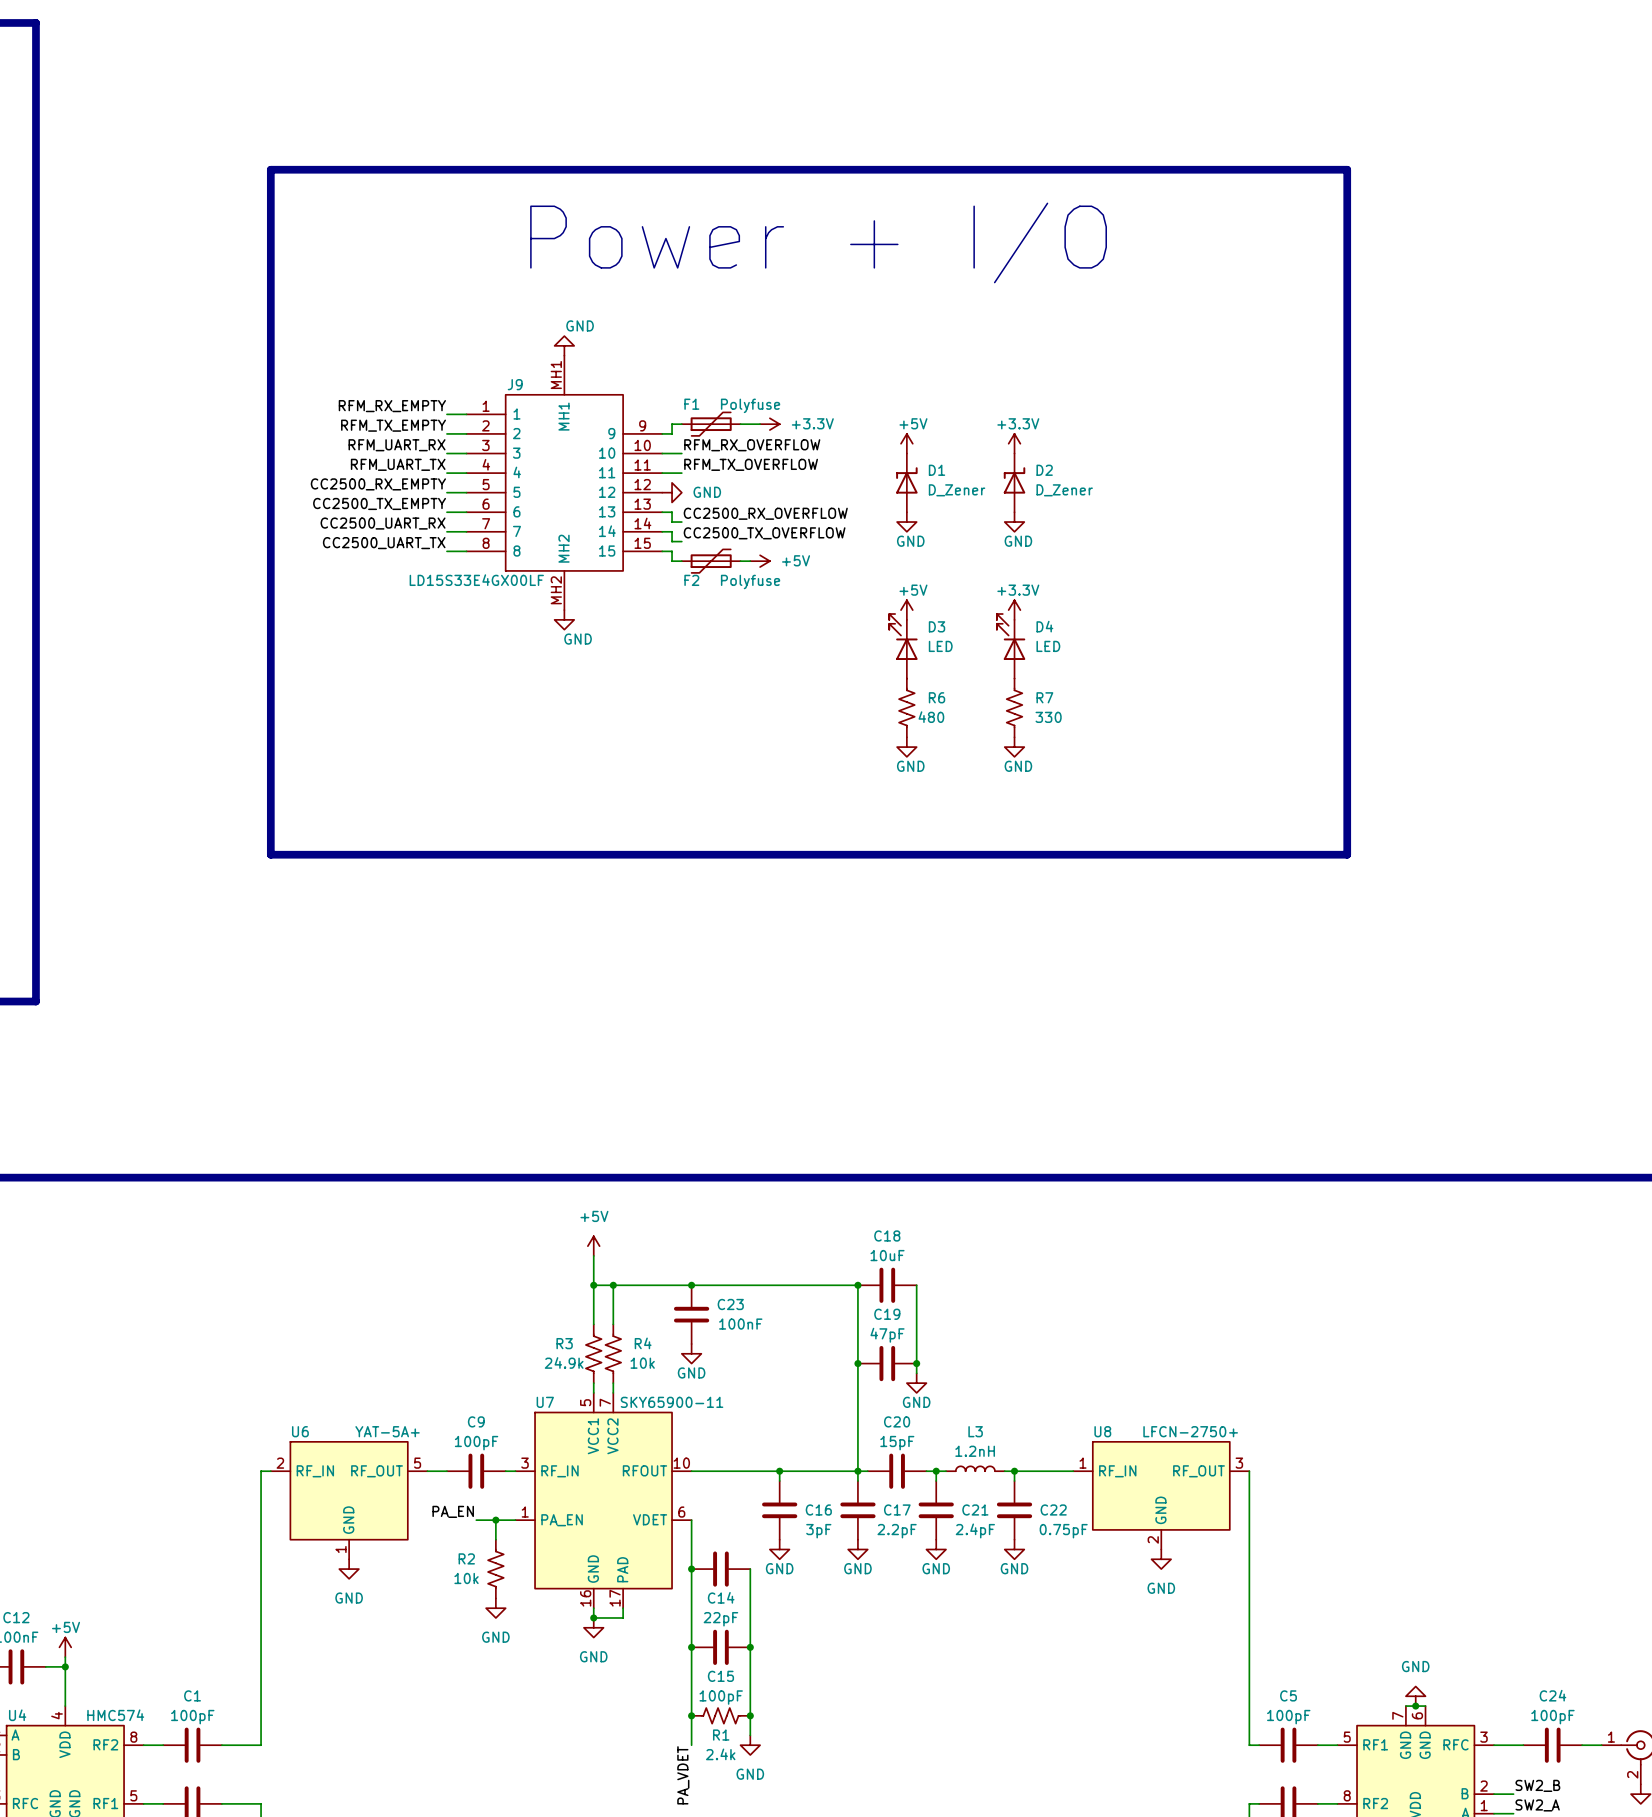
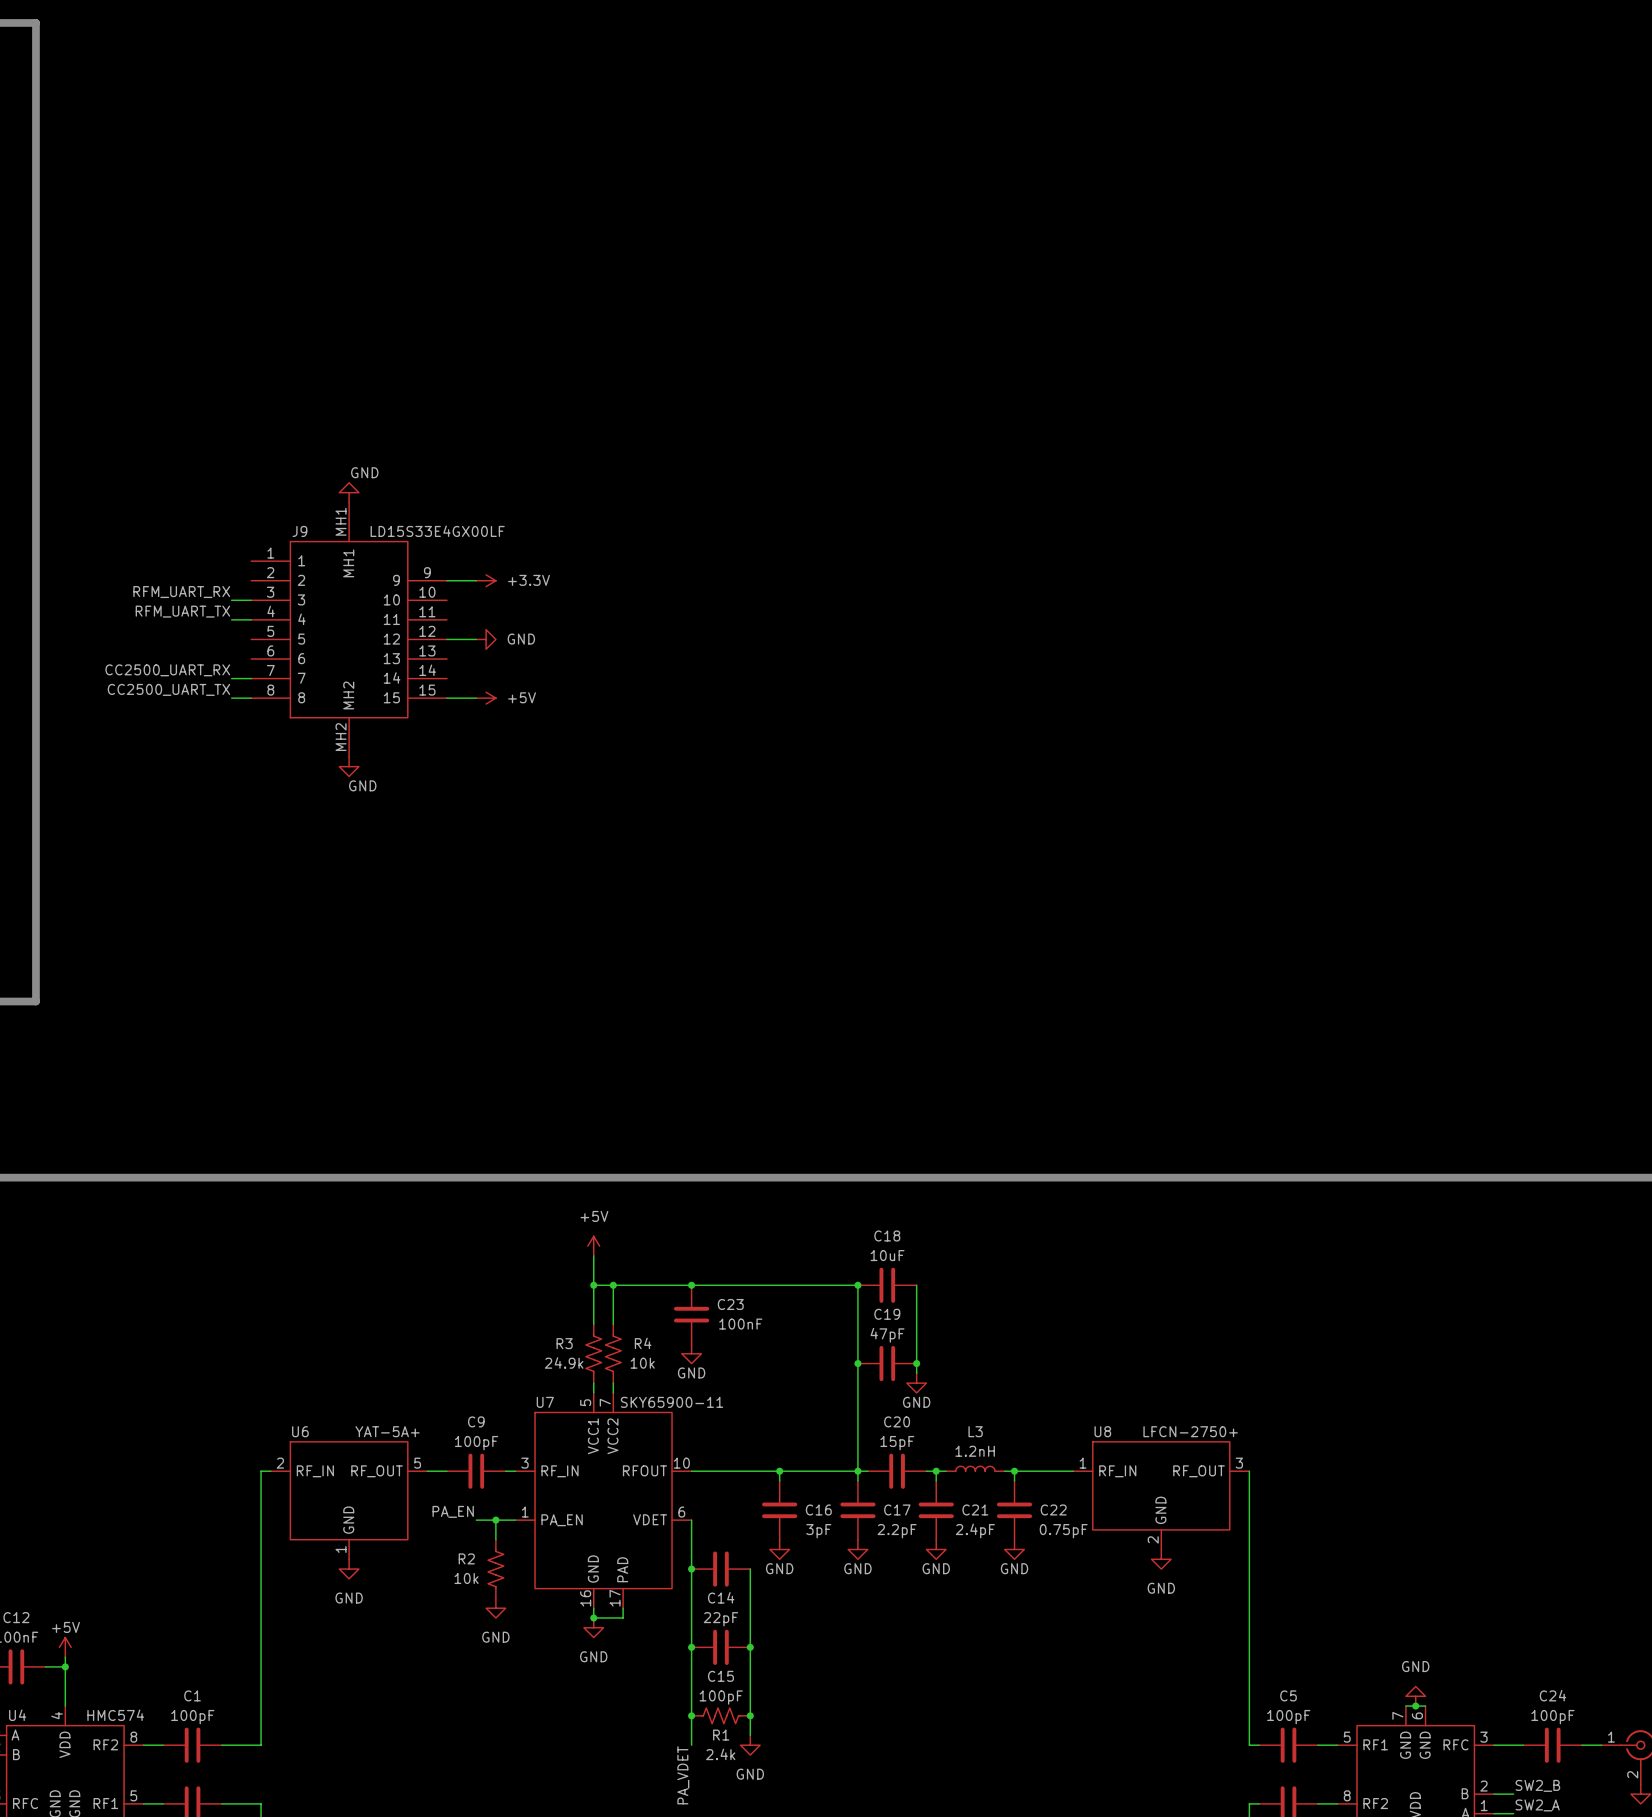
line: (270, 169) (270, 854) (1347, 854) (1347, 169) (270, 169) -> none
text: Power + I/O (818, 242) -> none
power symbol: GND (564, 345) -> none
label: RFM_RX_EMPTY (392, 406) -> none
wire: (446, 414) (466, 414) -> none
wire: (681, 424) (672, 424) (672, 433) (662, 433) -> none
F1: Polyfuse (711, 424) -> none
wire: (740, 424) (760, 424) -> none
power symbol: +3.3V (769, 424) -> none
label: RFM_TX_EMPTY (393, 425) -> none
wire: (446, 433) (466, 433) -> none
power symbol: +5V (906, 443) -> none
power symbol: +3.3V (1014, 443) -> none
label: RFM_UART_RX (397, 445) -> none
label: RFM_RX_OVERFLOW (752, 445) -> none
wire: (446, 453) (466, 453) -> none
wire: (662, 453) (681, 453) -> none
label: RFM_UART_TX (398, 464) -> none
label: RFM_TX_OVERFLOW (751, 464) -> none
wire: (446, 473) (466, 473) -> none
wire: (662, 473) (681, 473) -> none
J9 position: (564, 482) -> (349, 629)
D1: D_Zener (906, 482) -> none
D2: D_Zener (1014, 482) -> none
label: CC2500_RX_EMPTY (378, 484) -> none
power symbol: none -> GND (349, 492)
wire: (446, 492) (466, 492) -> none
power symbol: GND (672, 492) -> none
label: CC2500_TX_EMPTY (379, 503) -> none
wire: (446, 512) (466, 512) -> none
wire: (662, 512) (672, 512) (672, 522) (681, 522) -> none
label: CC2500_RX_OVERFLOW (765, 513) -> none
power symbol: GND (906, 522) -> none
power symbol: GND (1014, 522) -> none
label: CC2500_UART_RX (383, 523) -> none
wire: (446, 531) (466, 531) -> none
wire: (662, 531) (672, 531) (672, 541) (681, 541) -> none
label: CC2500_TX_OVERFLOW (764, 533) -> none
label: CC2500_UART_TX (384, 543) -> none
wire: (446, 551) (466, 551) -> none
wire: (662, 551) (672, 551) (672, 561) (681, 561) -> none
F2: Polyfuse (711, 561) -> none
wire: (740, 561) (750, 561) -> none
power symbol: +5V (760, 561) -> none
wire: none -> (446, 580) (476, 580)
J9 value position: LD15S33E4GX00LF (476, 580) -> LD15S33E4GX00LF (437, 531)
power symbol: none -> +3.3V (486, 580)
label: none -> RFM_UART_RX (181, 592)
wire: none -> (231, 600) (251, 600)
power symbol: +5V (906, 610) -> none
power symbol: +3.3V (1014, 610) -> none
label: none -> RFM_UART_TX (182, 611)
wire: none -> (231, 619) (251, 619)
power symbol rotation: 0° (564, 619) -> 90° counterclockwise (486, 639)
power symbol position: GND (564, 619) -> GND (486, 639)
wire: none -> (446, 639) (476, 639)
power symbol text position: GND (578, 639) -> GND (521, 639)
D3: LED (903, 646) -> none
D4: LED (1011, 646) -> none
label: none -> CC2500_UART_RX (167, 670)
wire: none -> (231, 678) (251, 678)
label: none -> CC2500_UART_TX (168, 689)
wire: none -> (231, 698) (251, 698)
wire: none -> (446, 698) (476, 698)
power symbol: none -> +5V (486, 698)
R6: 480 (906, 707) -> none
R7: 330 (1014, 707) -> none
power symbol: GND (906, 747) -> none
power symbol: GND (1014, 747) -> none
power symbol: none -> GND (349, 766)

